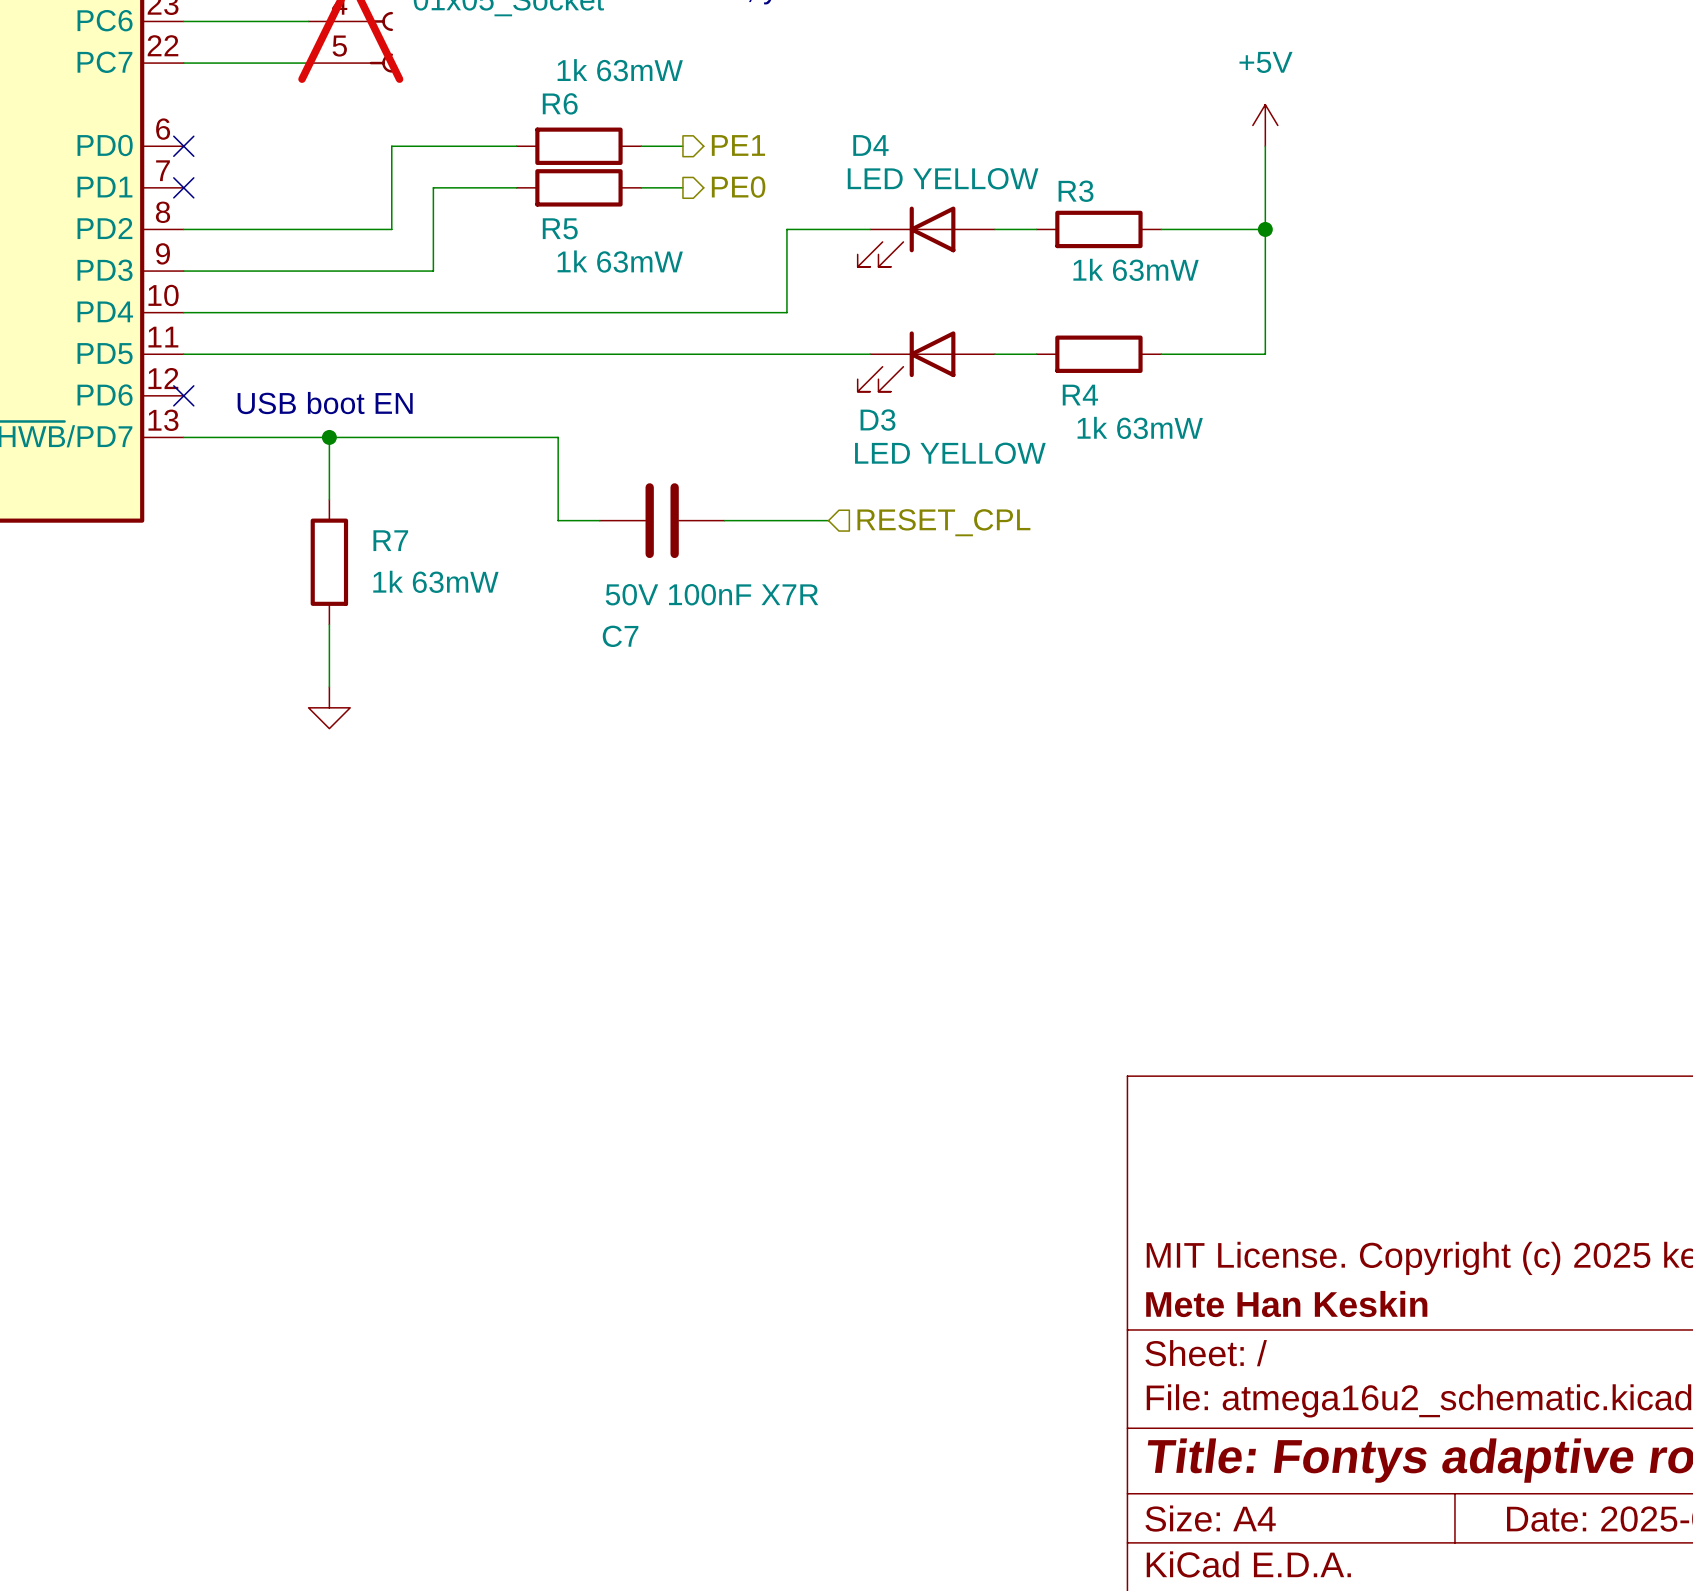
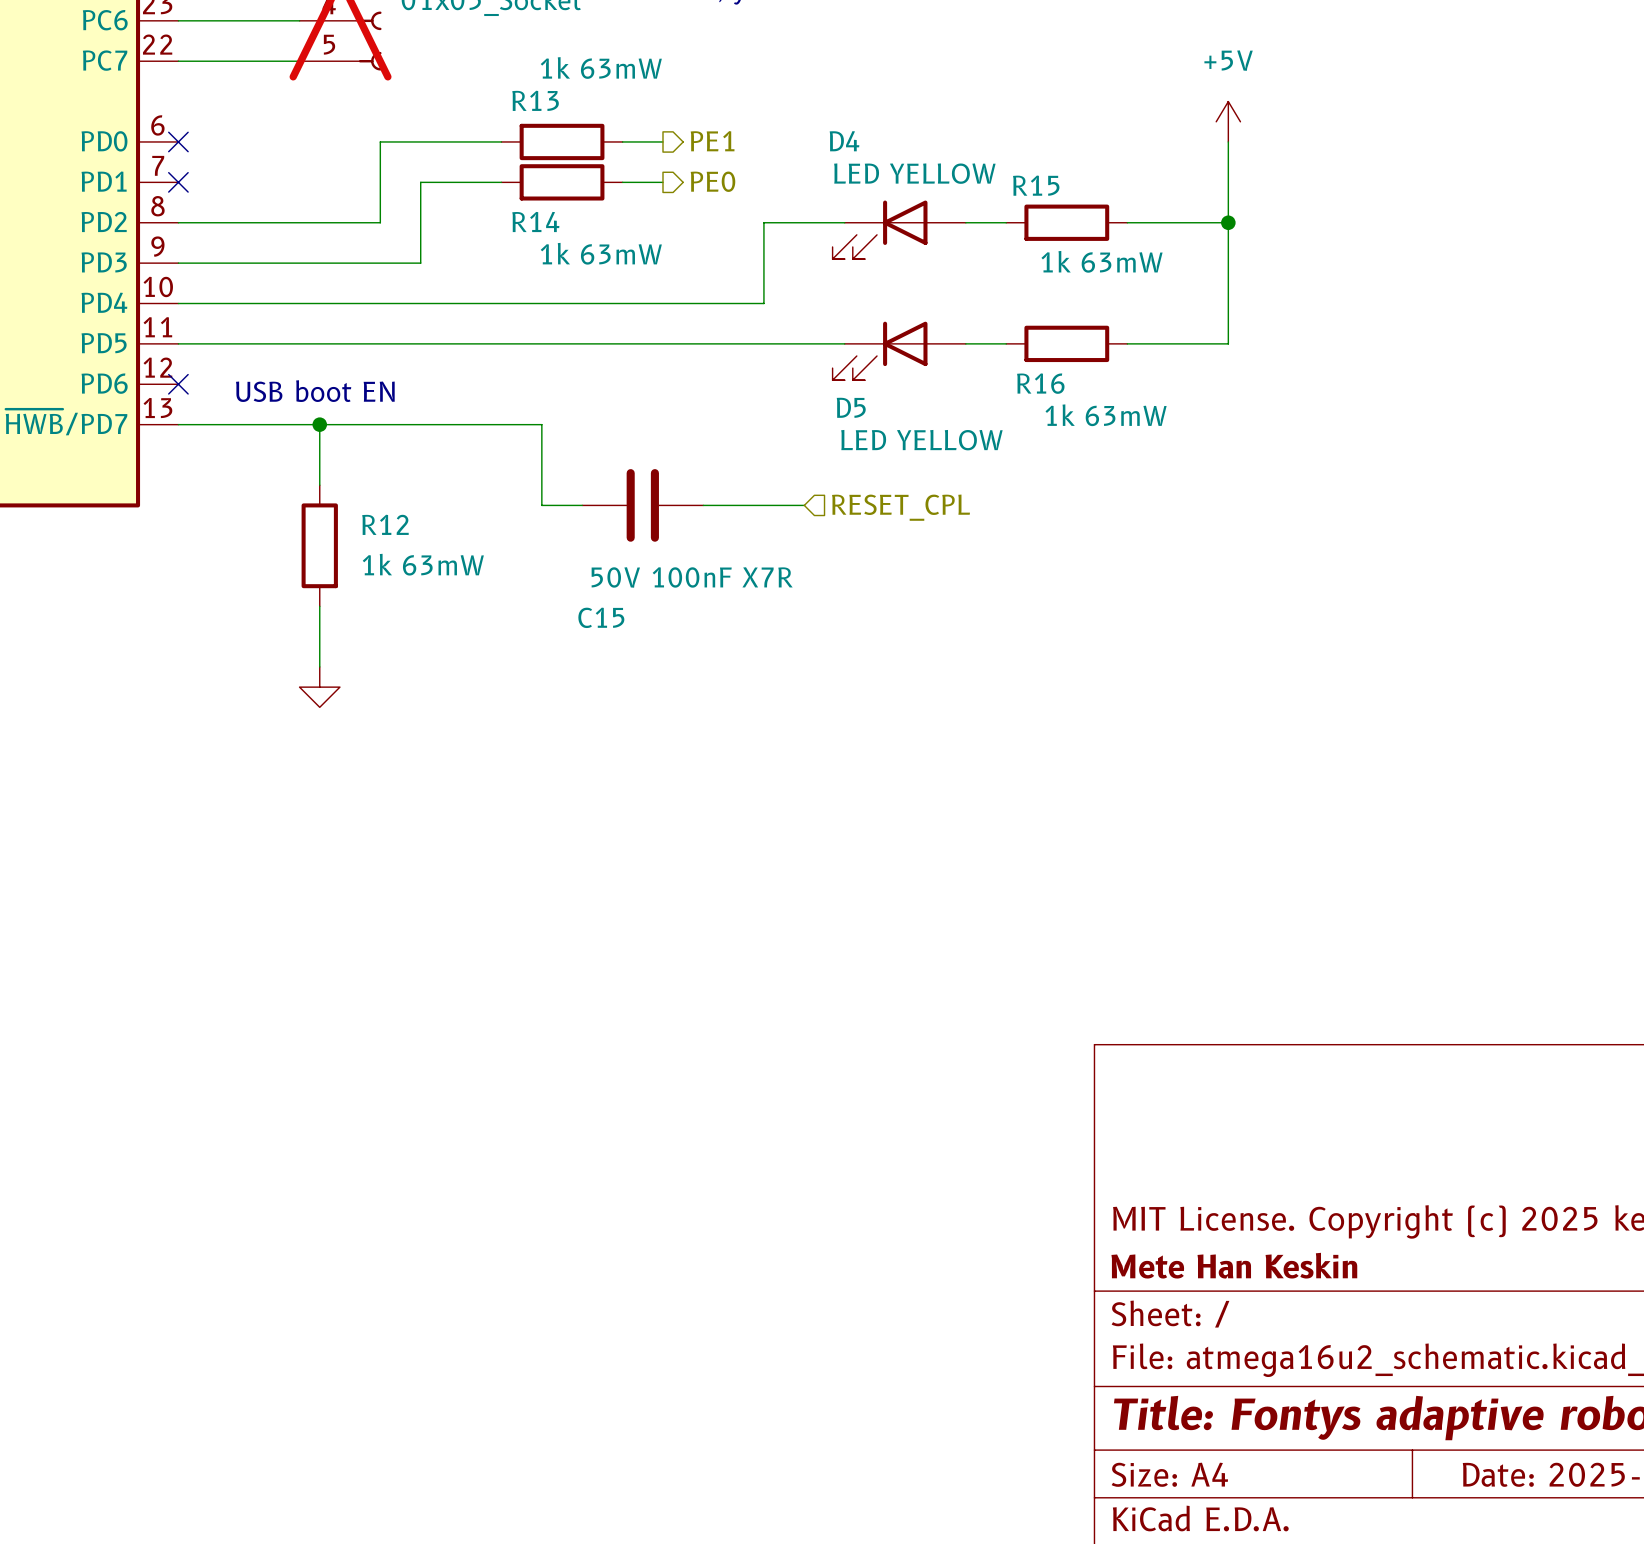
R6 name: R6 (560, 103) -> R13 (535, 100)
R3 name: R3 (1076, 191) -> R15 (1036, 185)
R5 name: R5 (560, 228) -> R14 (535, 221)
R4 name: R4 (1080, 395) -> R16 (1040, 383)
D3 name: D3 (878, 420) -> D5 (851, 407)
R7 name: R7 (390, 540) -> R12 (385, 524)
C7 name: C7 (620, 636) -> C15 (601, 617)

